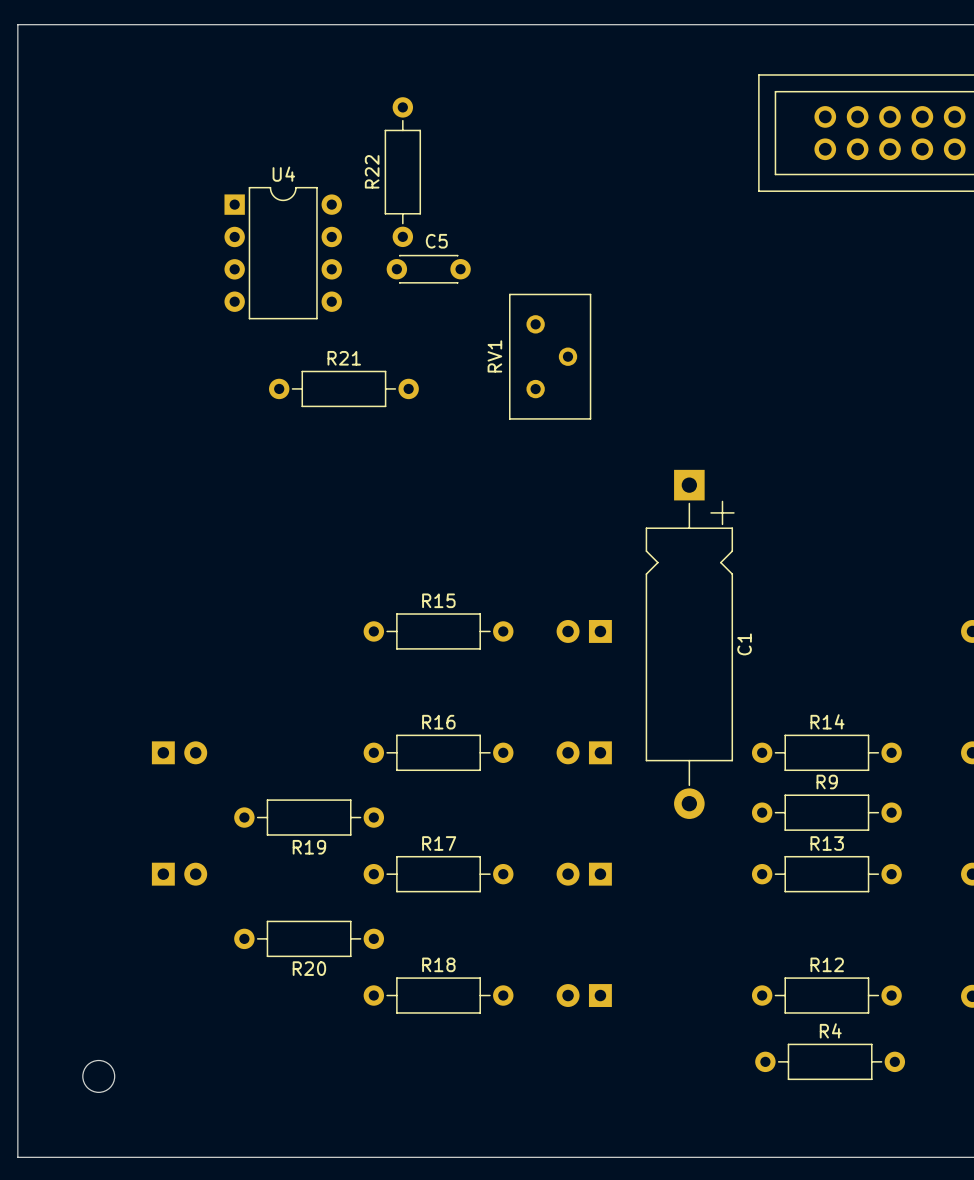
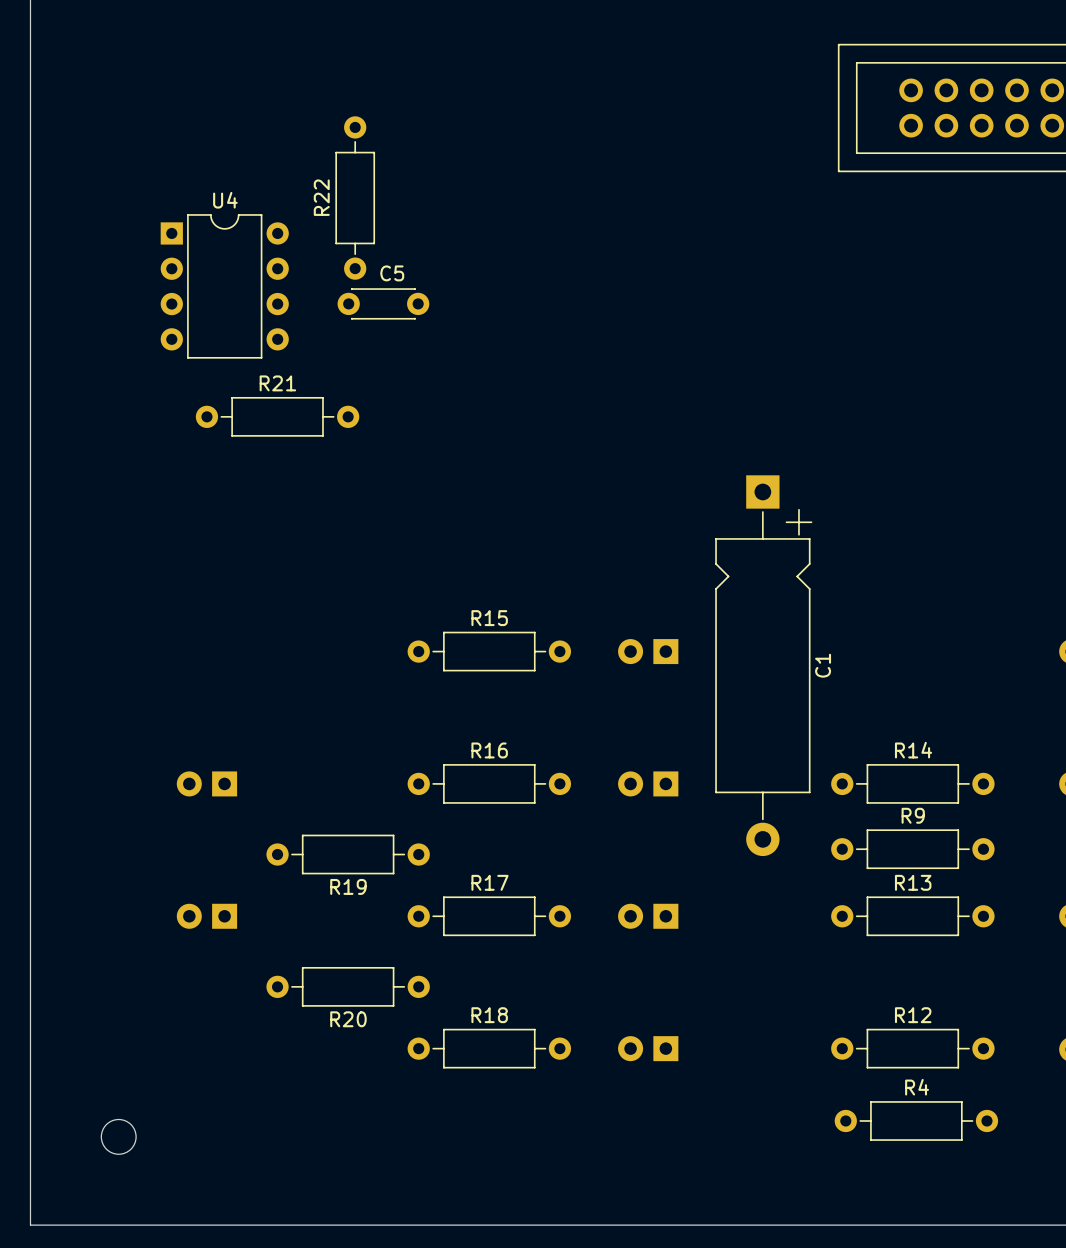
R22 position: (402, 172) -> (355, 198)
U4 position: (283, 253) -> (224, 286)
C5 position: (428, 269) -> (383, 303)
RV1: (550, 356) -> none
R21 position: (343, 388) -> (277, 416)
part rotation: 0° (179, 752) -> 180° (206, 783)
part rotation: 0° (179, 874) -> 180° (206, 916)

